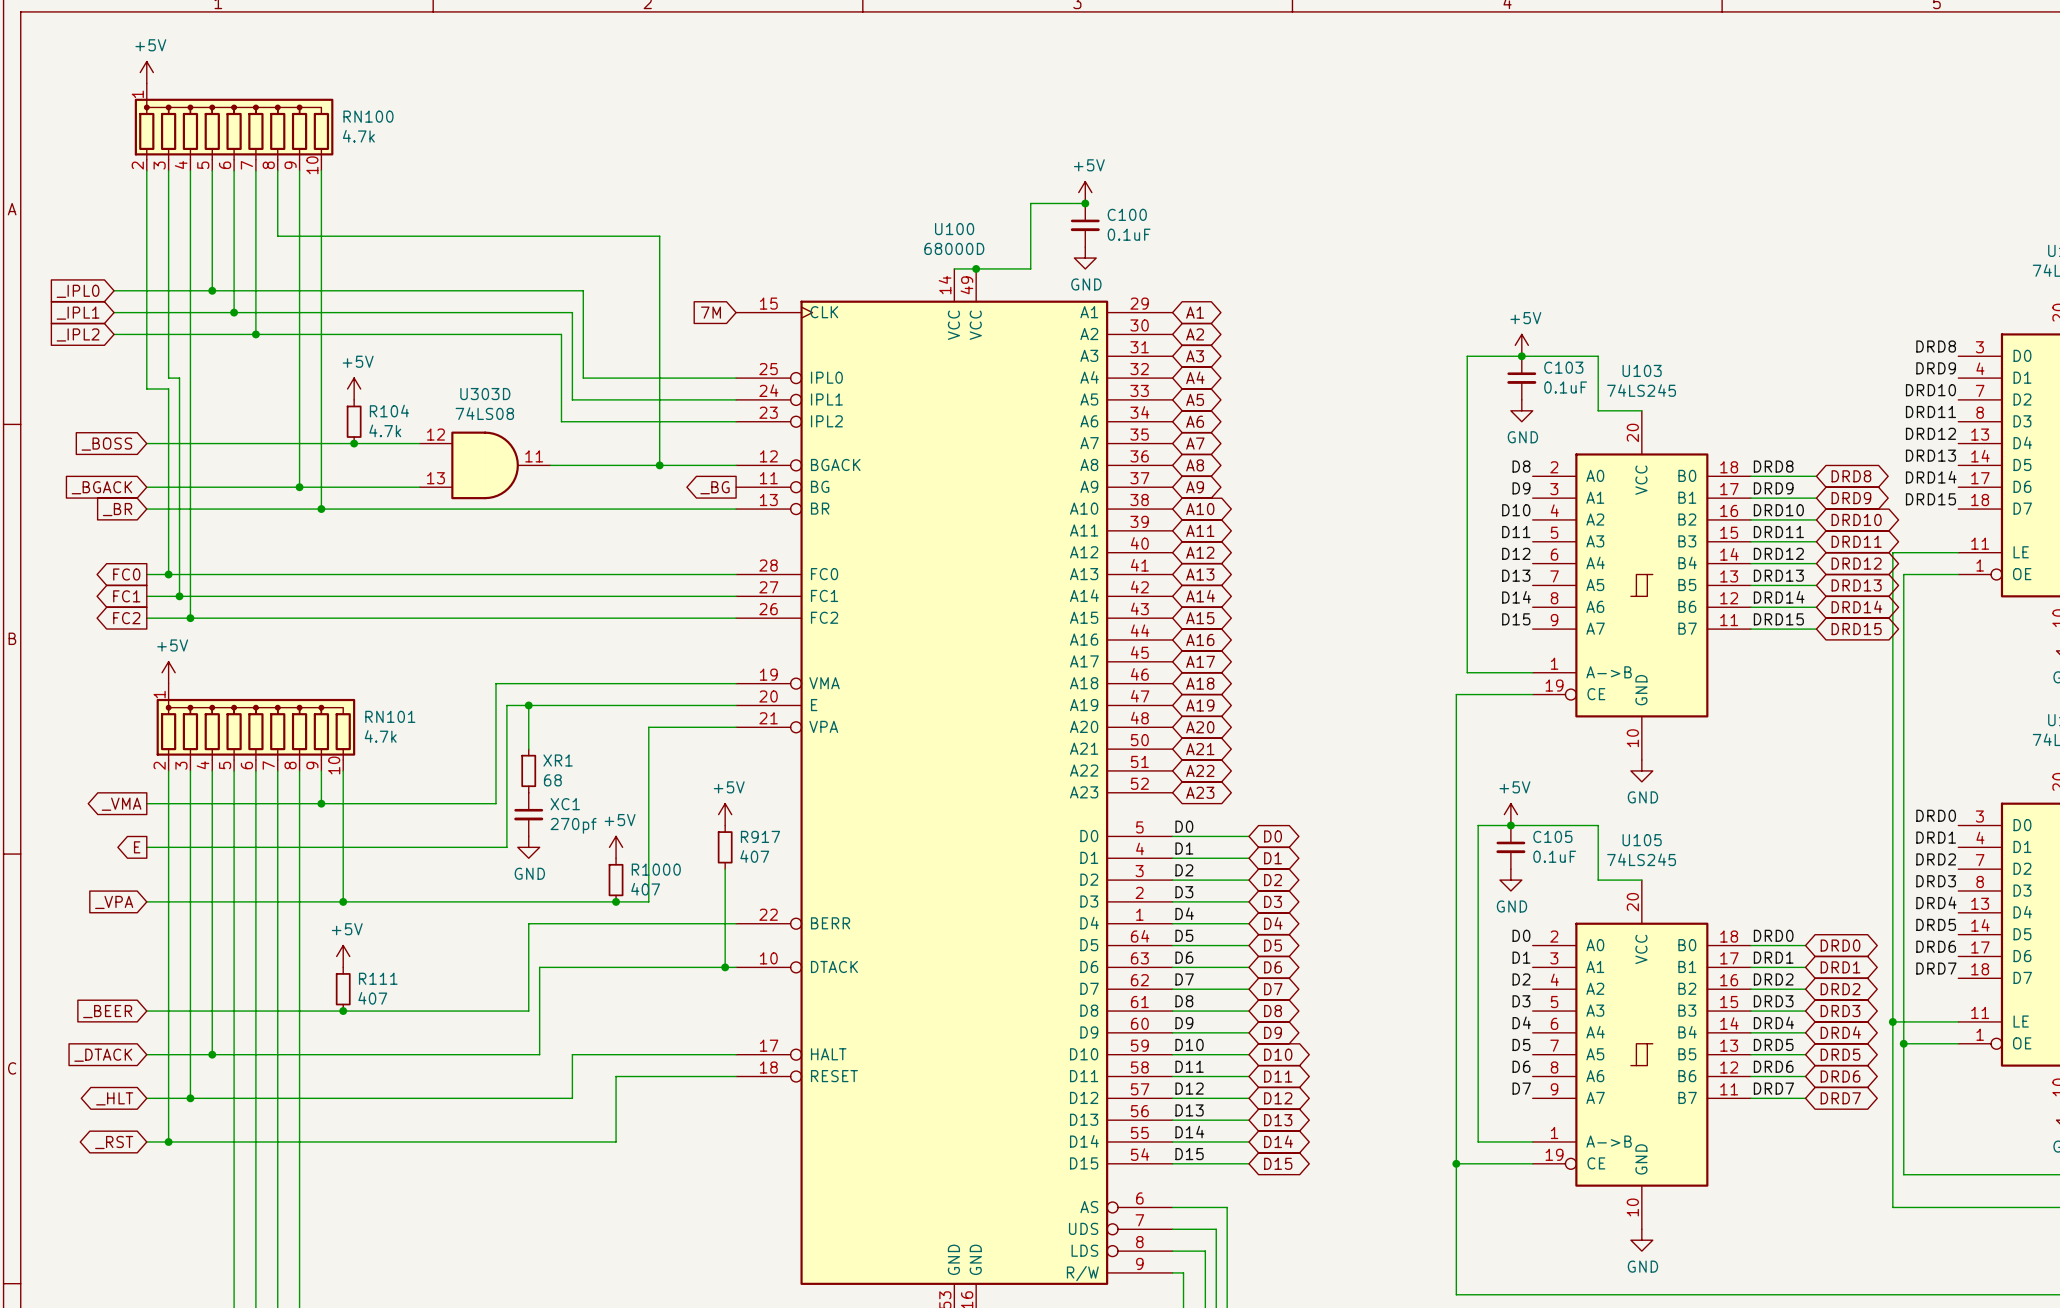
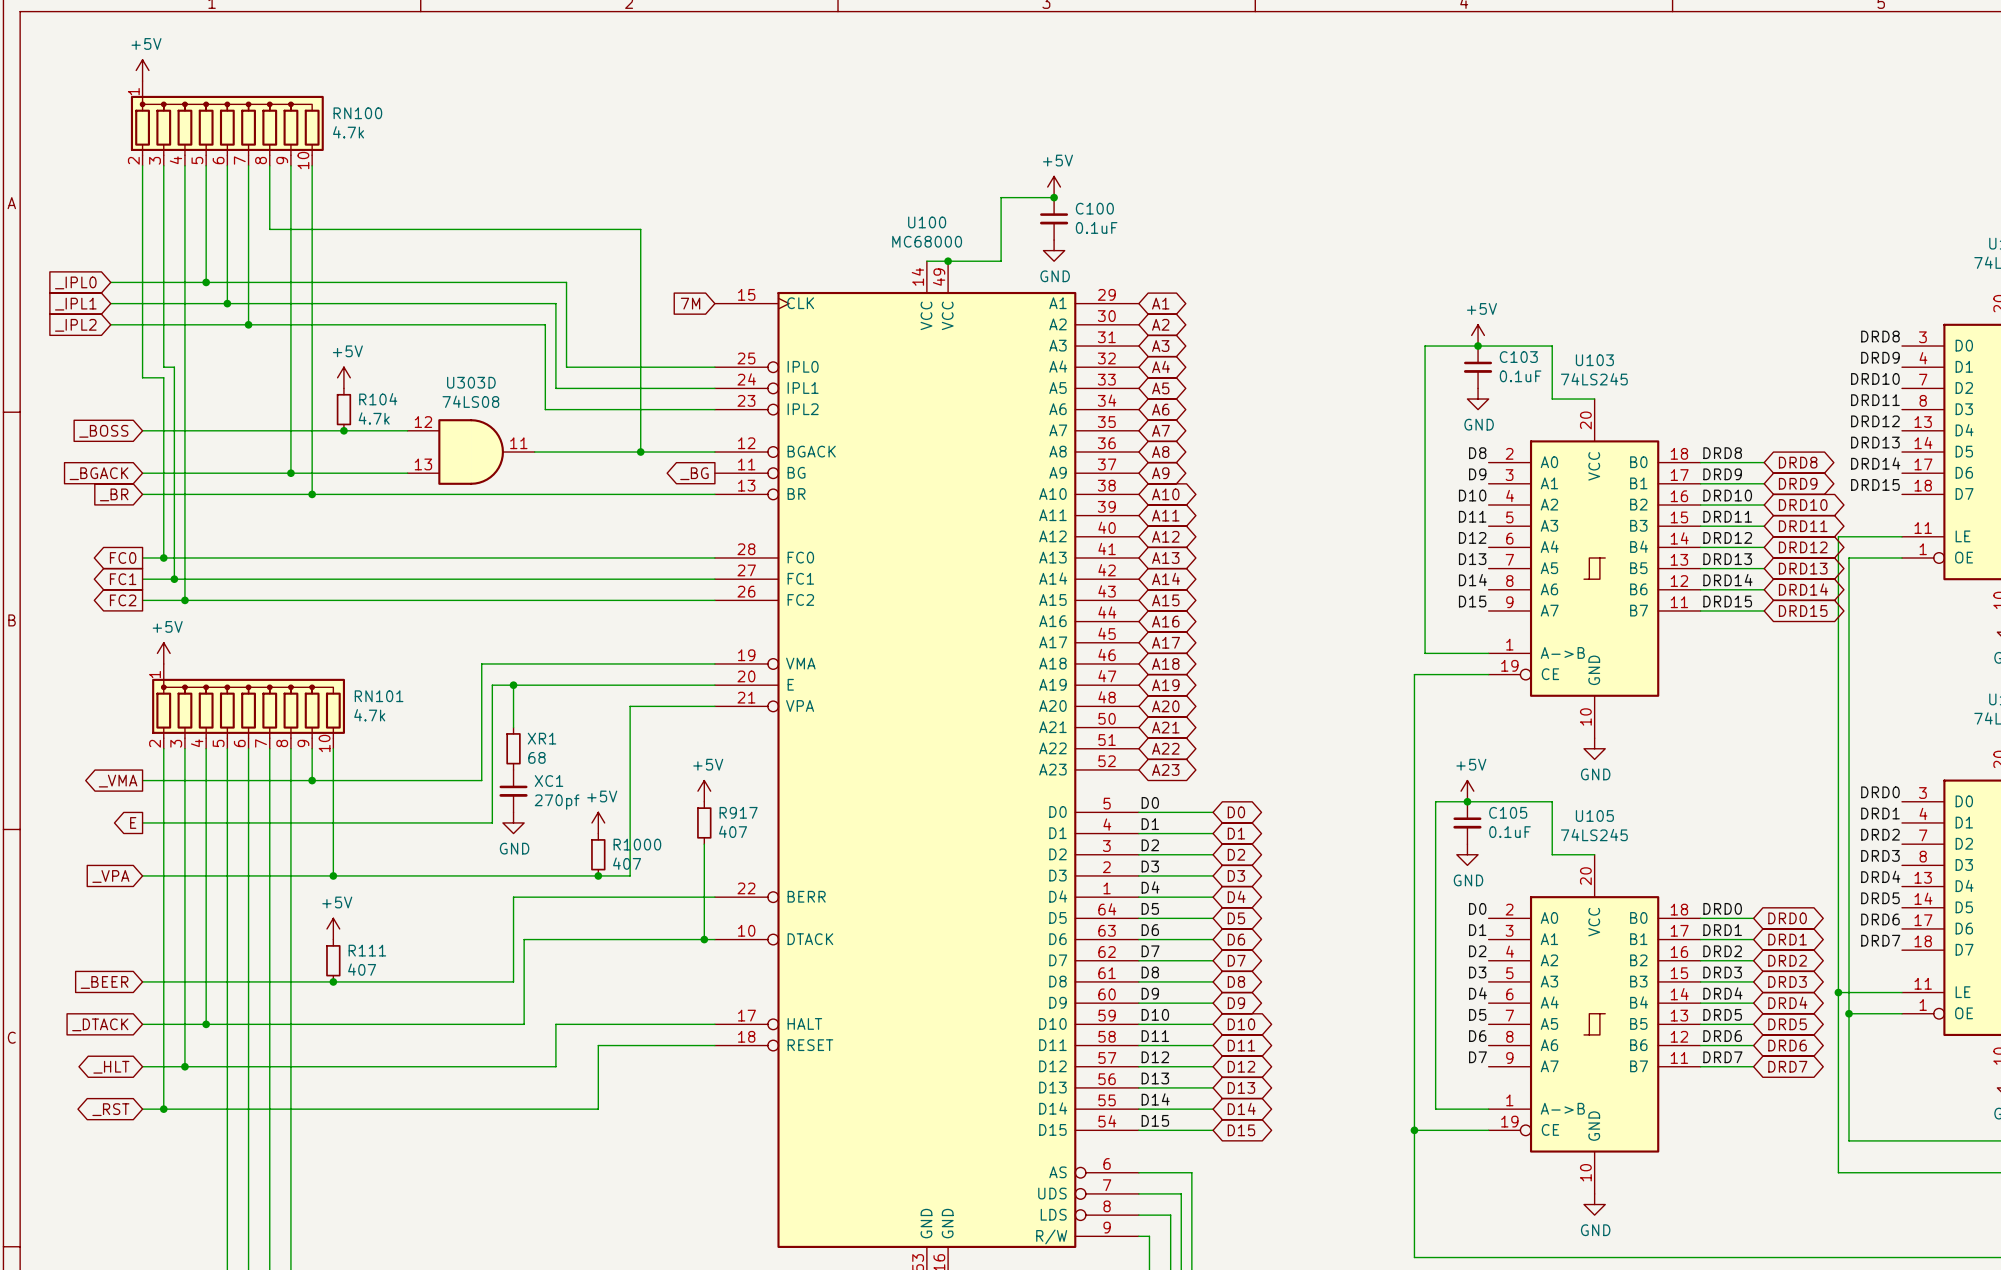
U100 value: 68000D (954, 248) -> MC68000 (927, 241)

